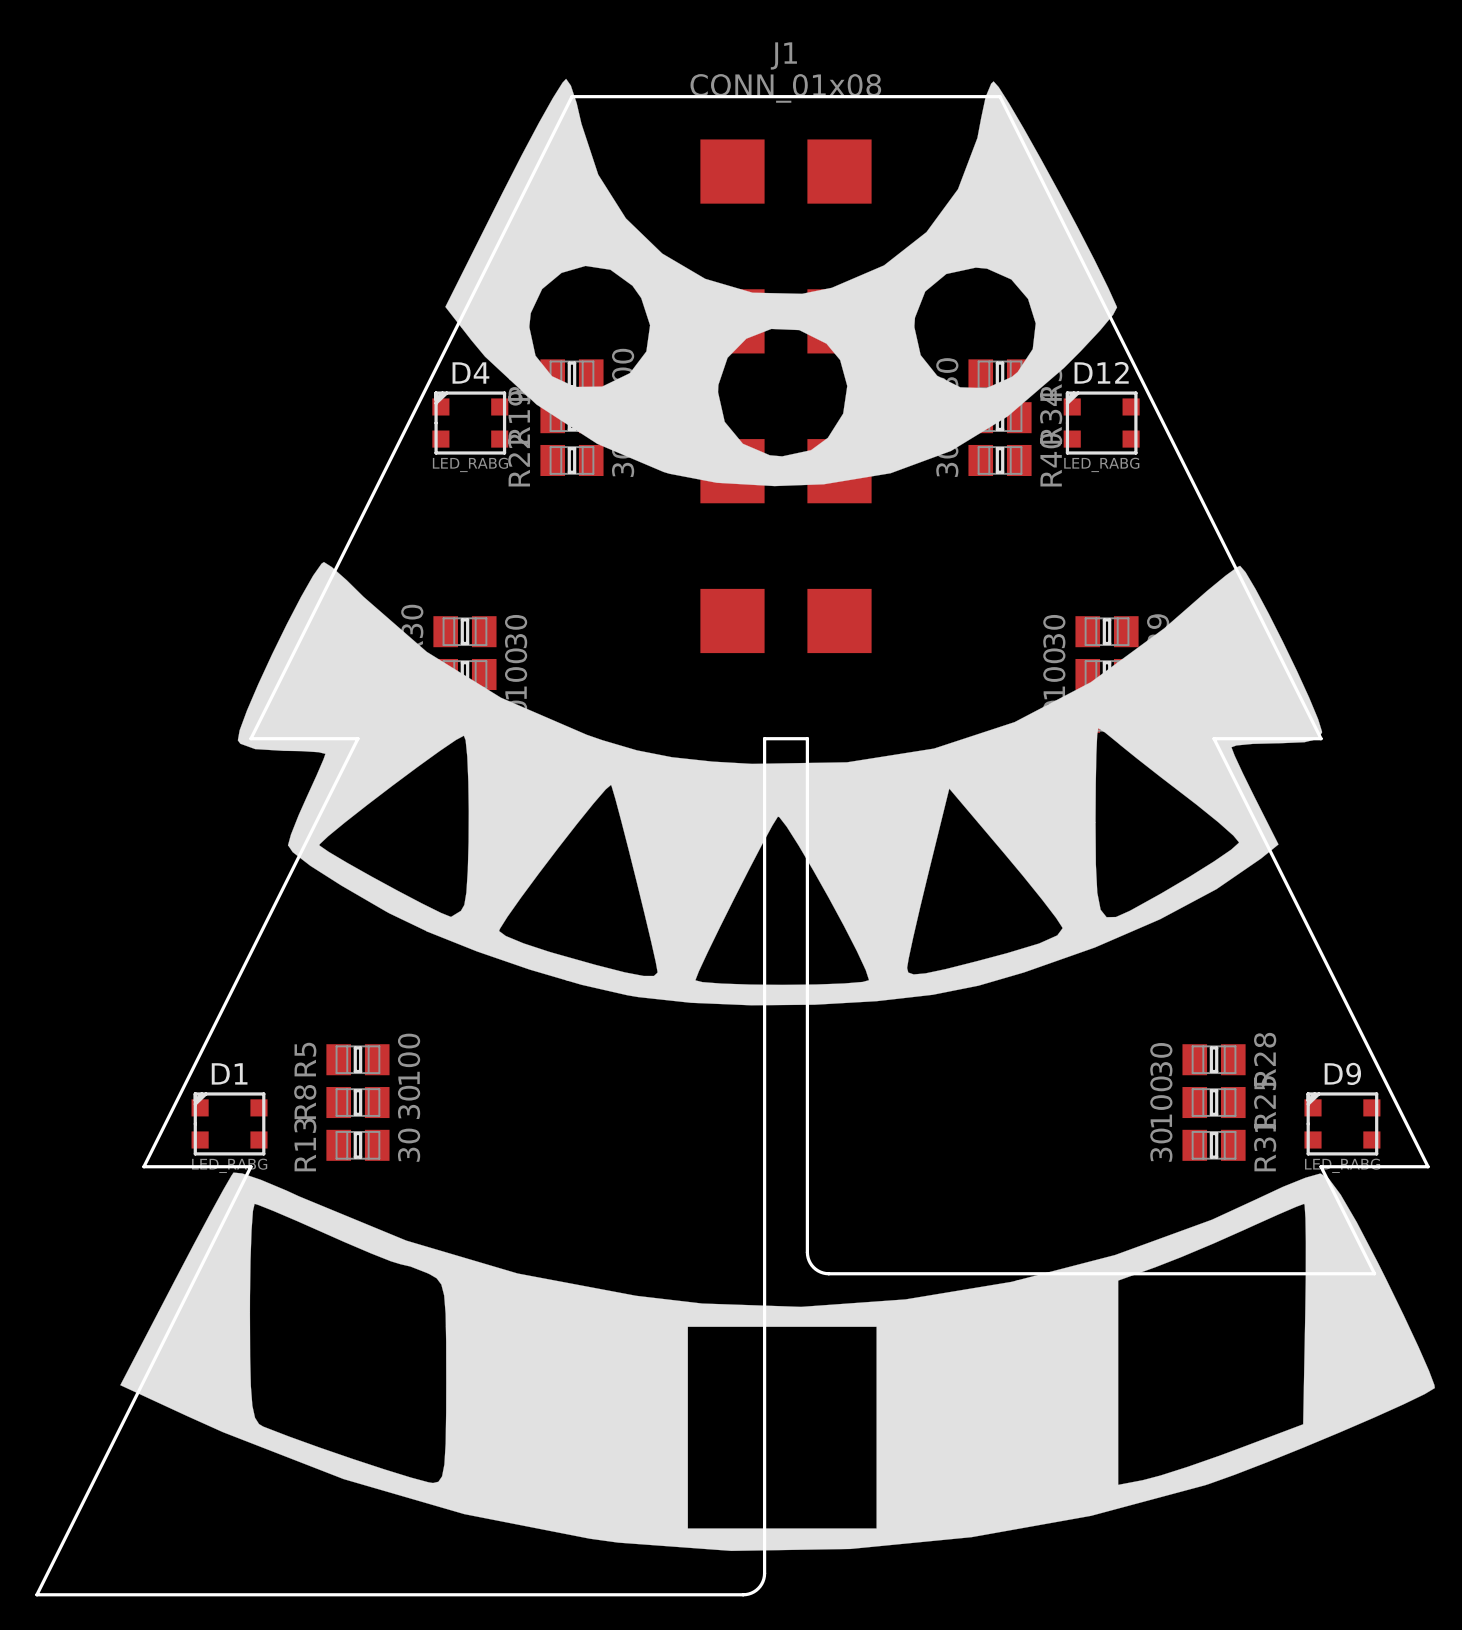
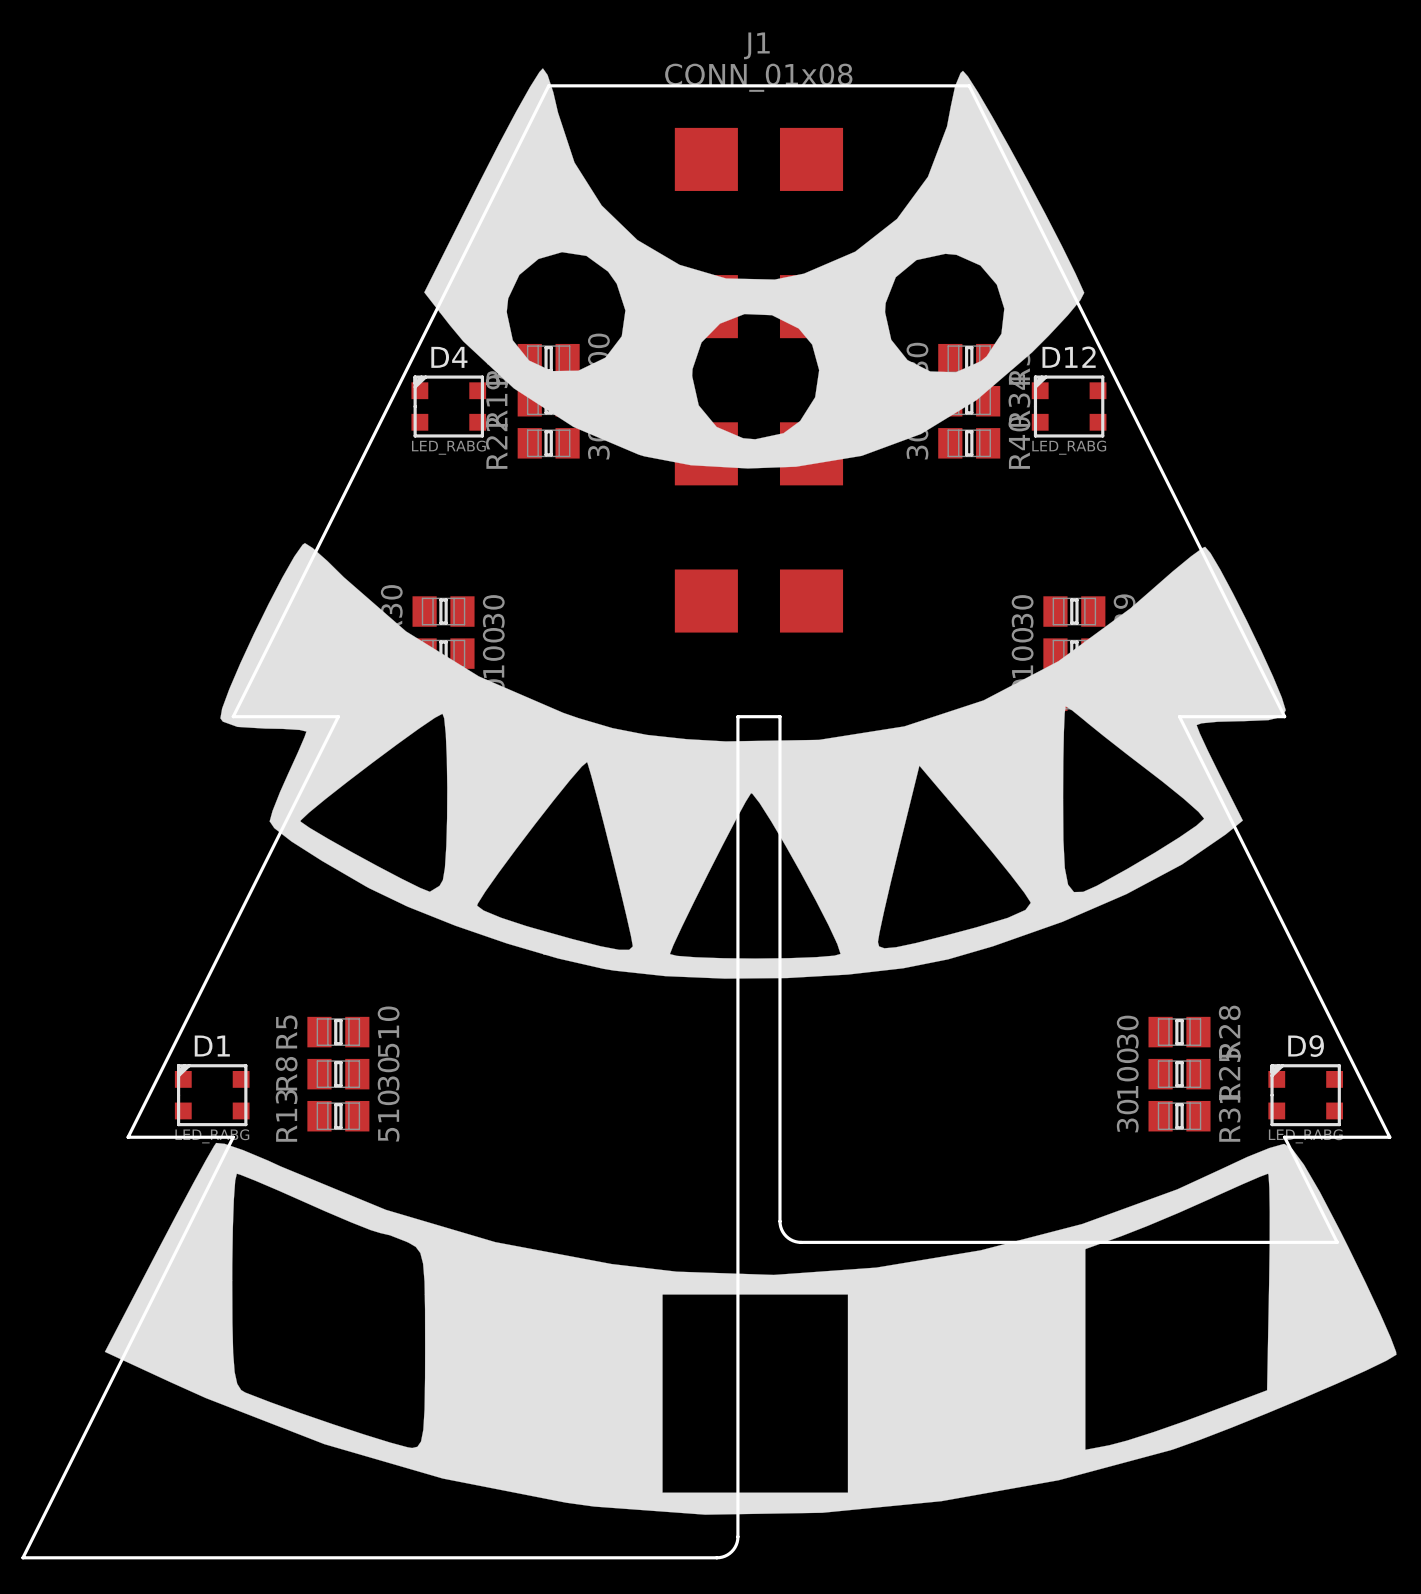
R5 value: 100 (409, 1059) -> 510 (388, 1031)
R13 value: 30 (409, 1145) -> 510 (388, 1116)

